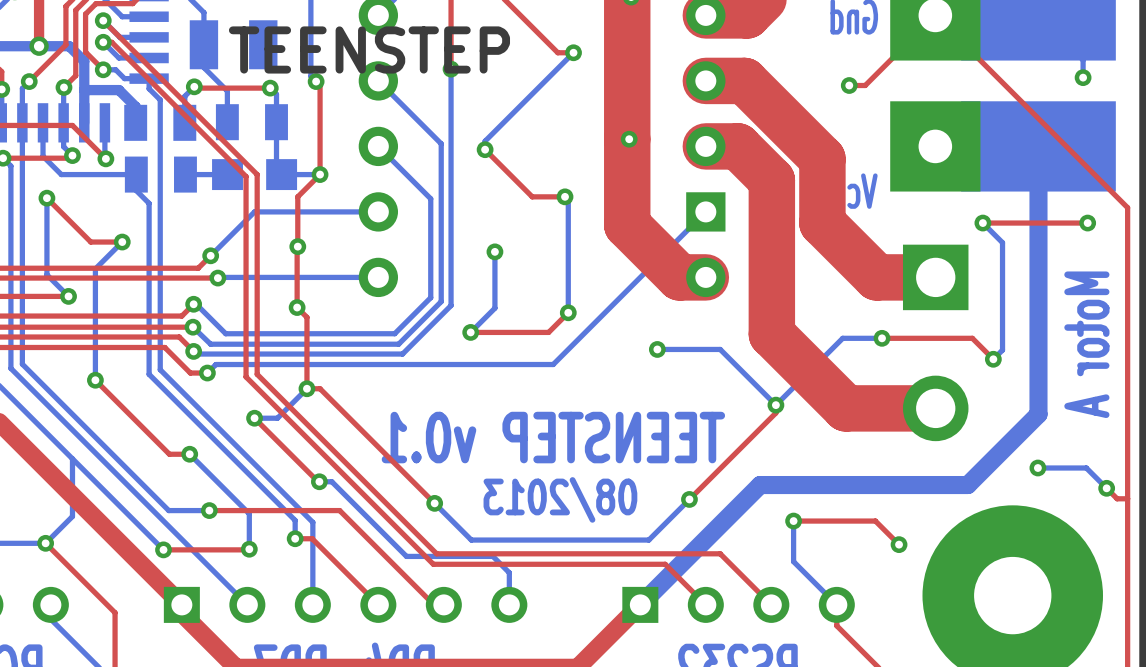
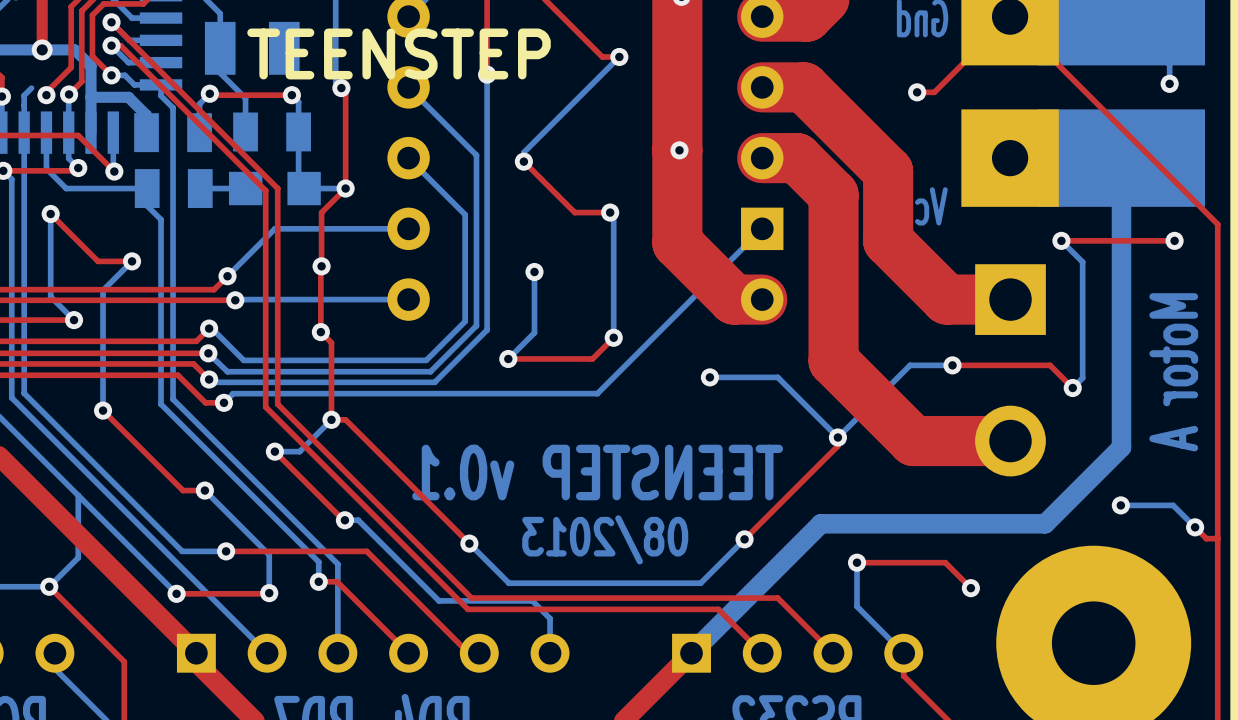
top track: (65, 44) (29, 81) -> (71, 48) (71, 67) (46, 92) (46, 95)
via position: (29, 81) -> (46, 95)

